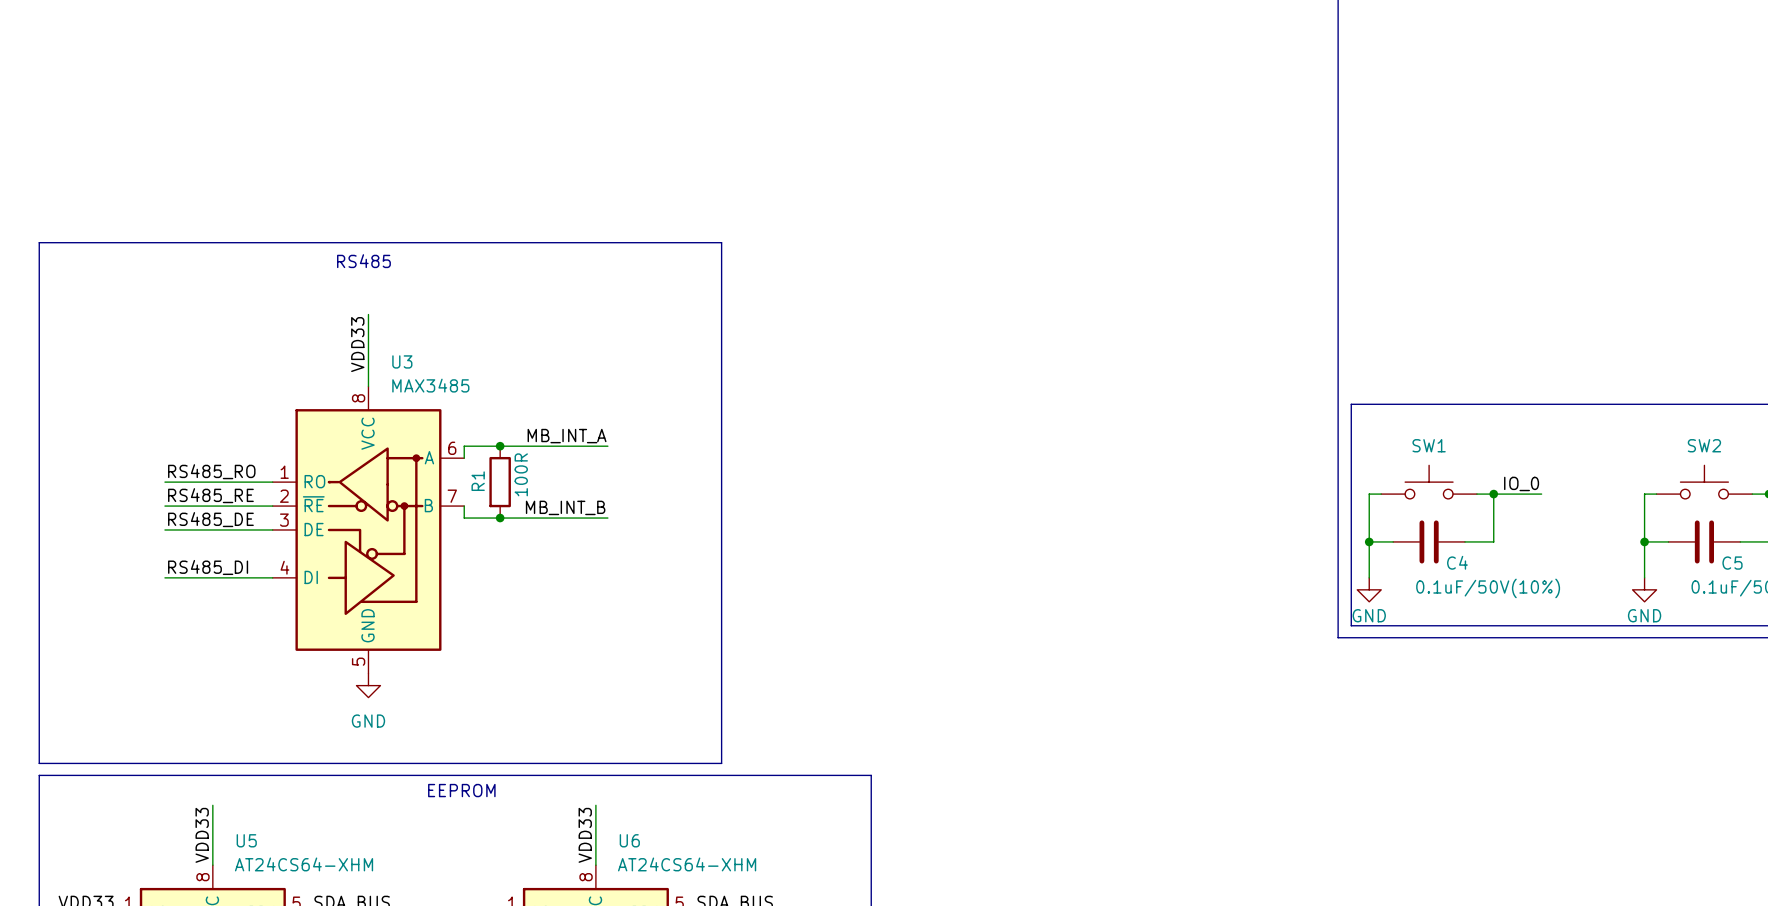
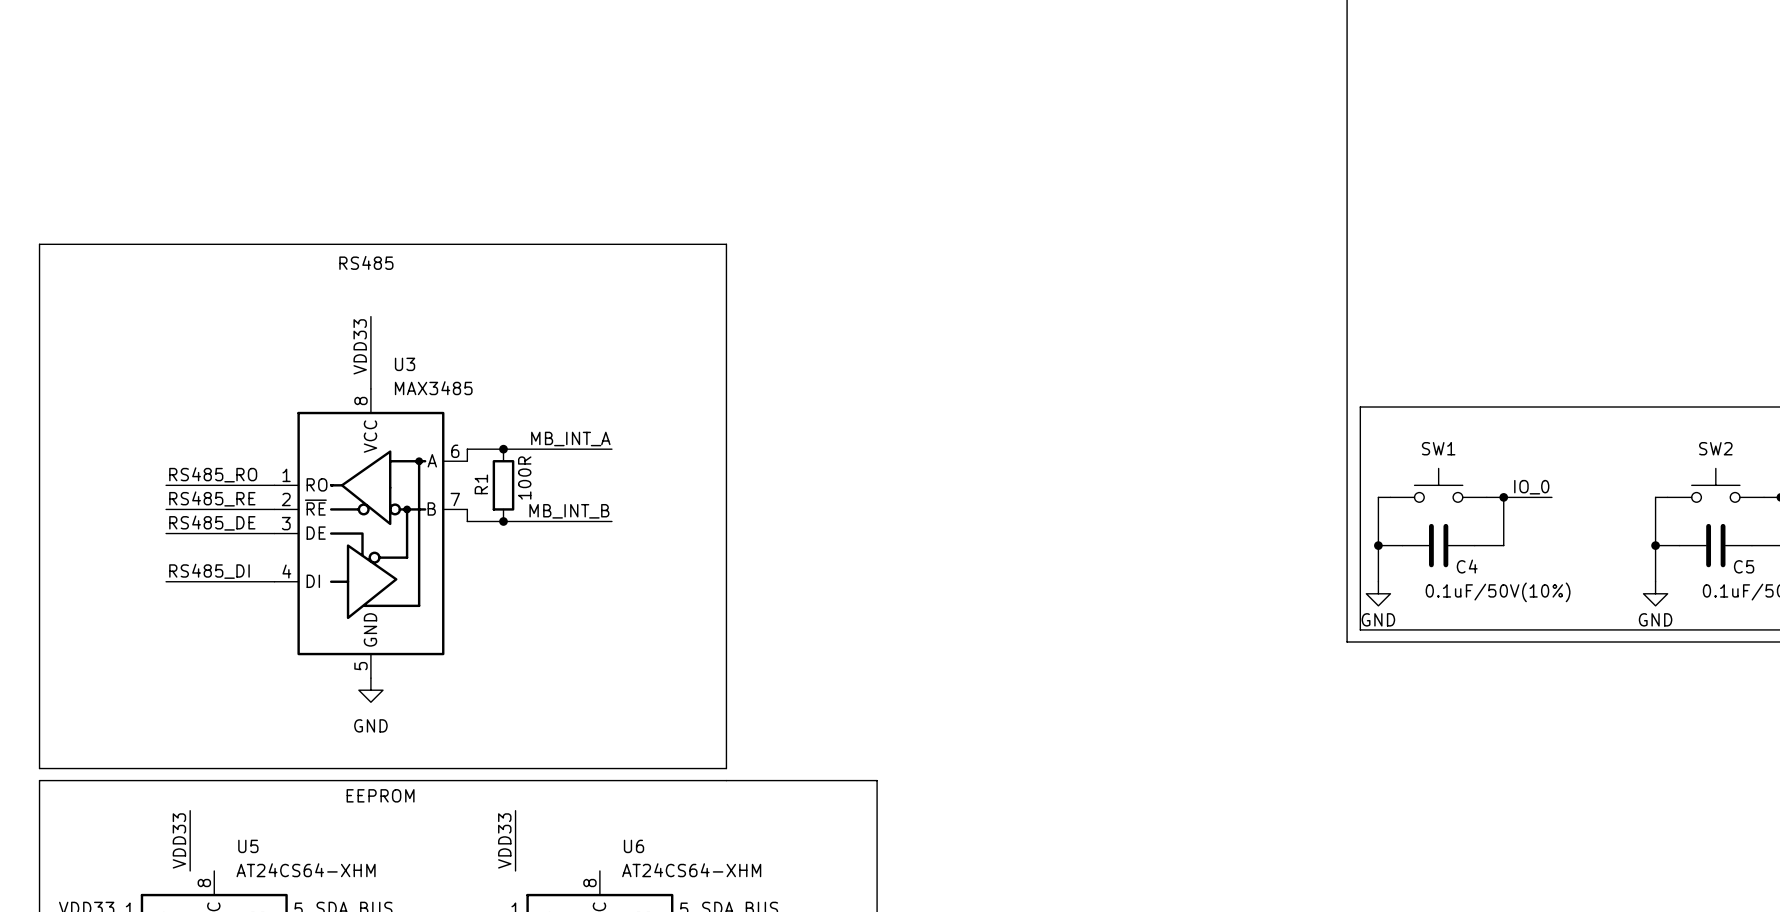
text position: EEPROM (461, 790) -> EEPROM (380, 795)
wire: (212, 805) (212, 865) -> (190, 810) (190, 870)
wire: (595, 805) (595, 865) -> (515, 810) (515, 870)
label position: VDD33 (202, 835) -> VDD33 (179, 840)
label: none -> VDD33 (504, 840)
label: VDD33 (585, 835) -> none

